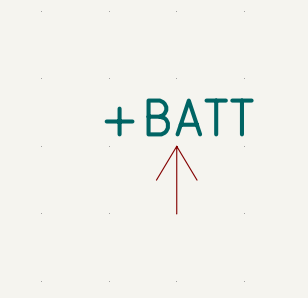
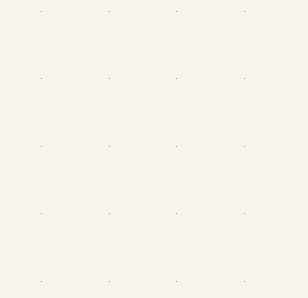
power symbol: +BATT (176, 180) -> none

